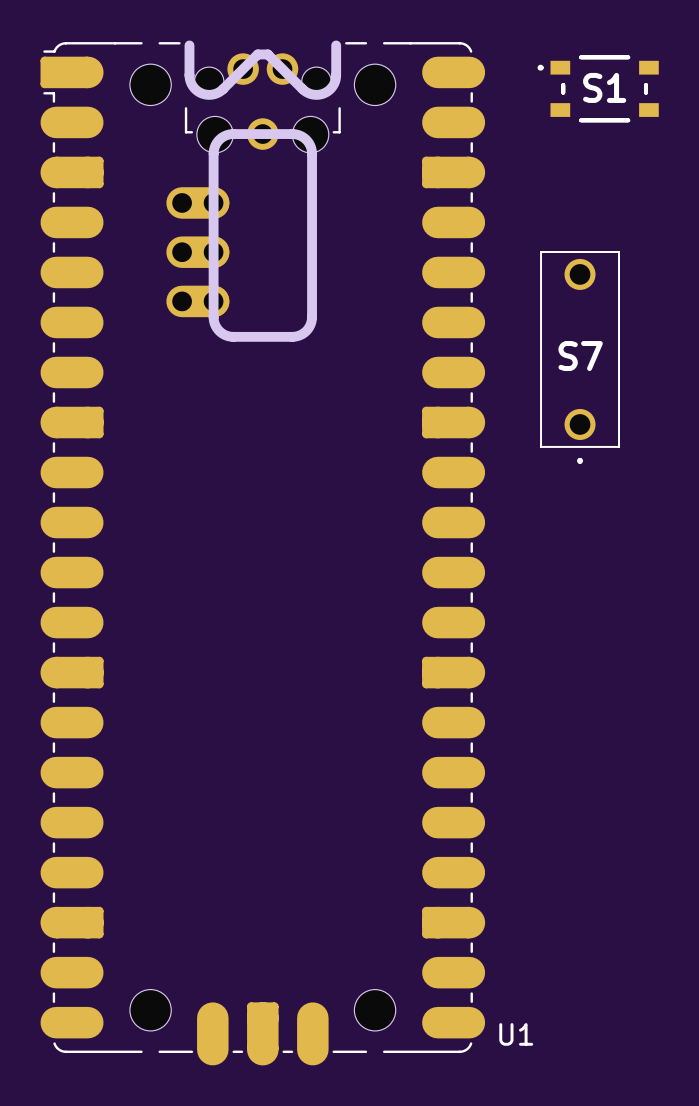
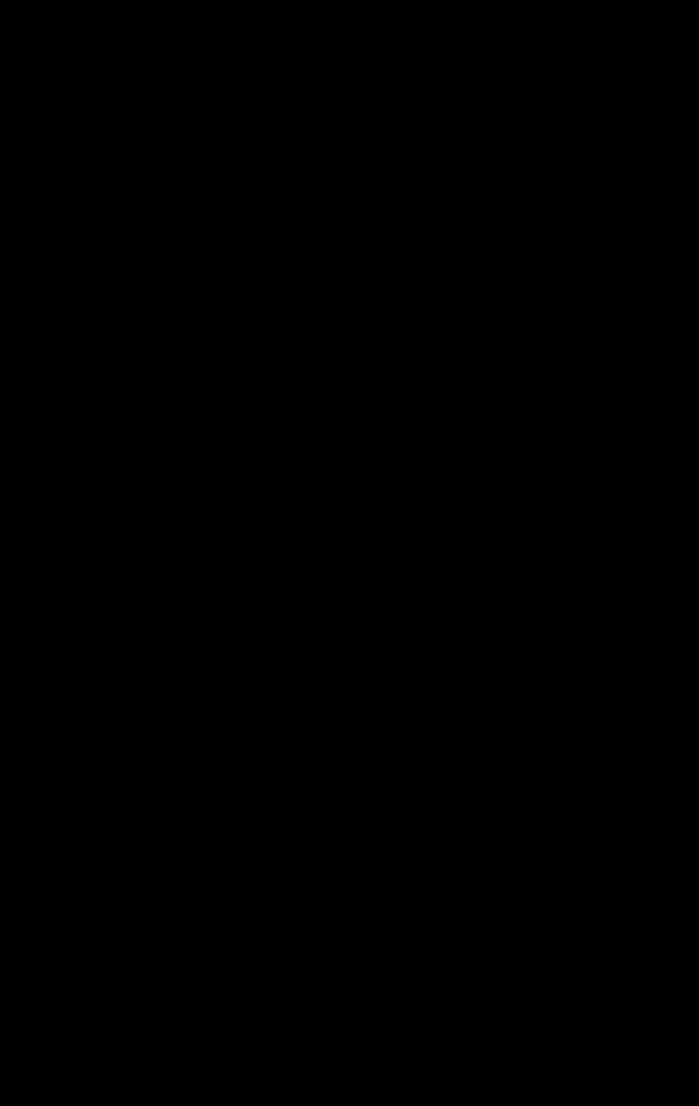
S1: (598, 88) -> none
S7: (580, 357) -> none
U1: (262, 552) -> none

